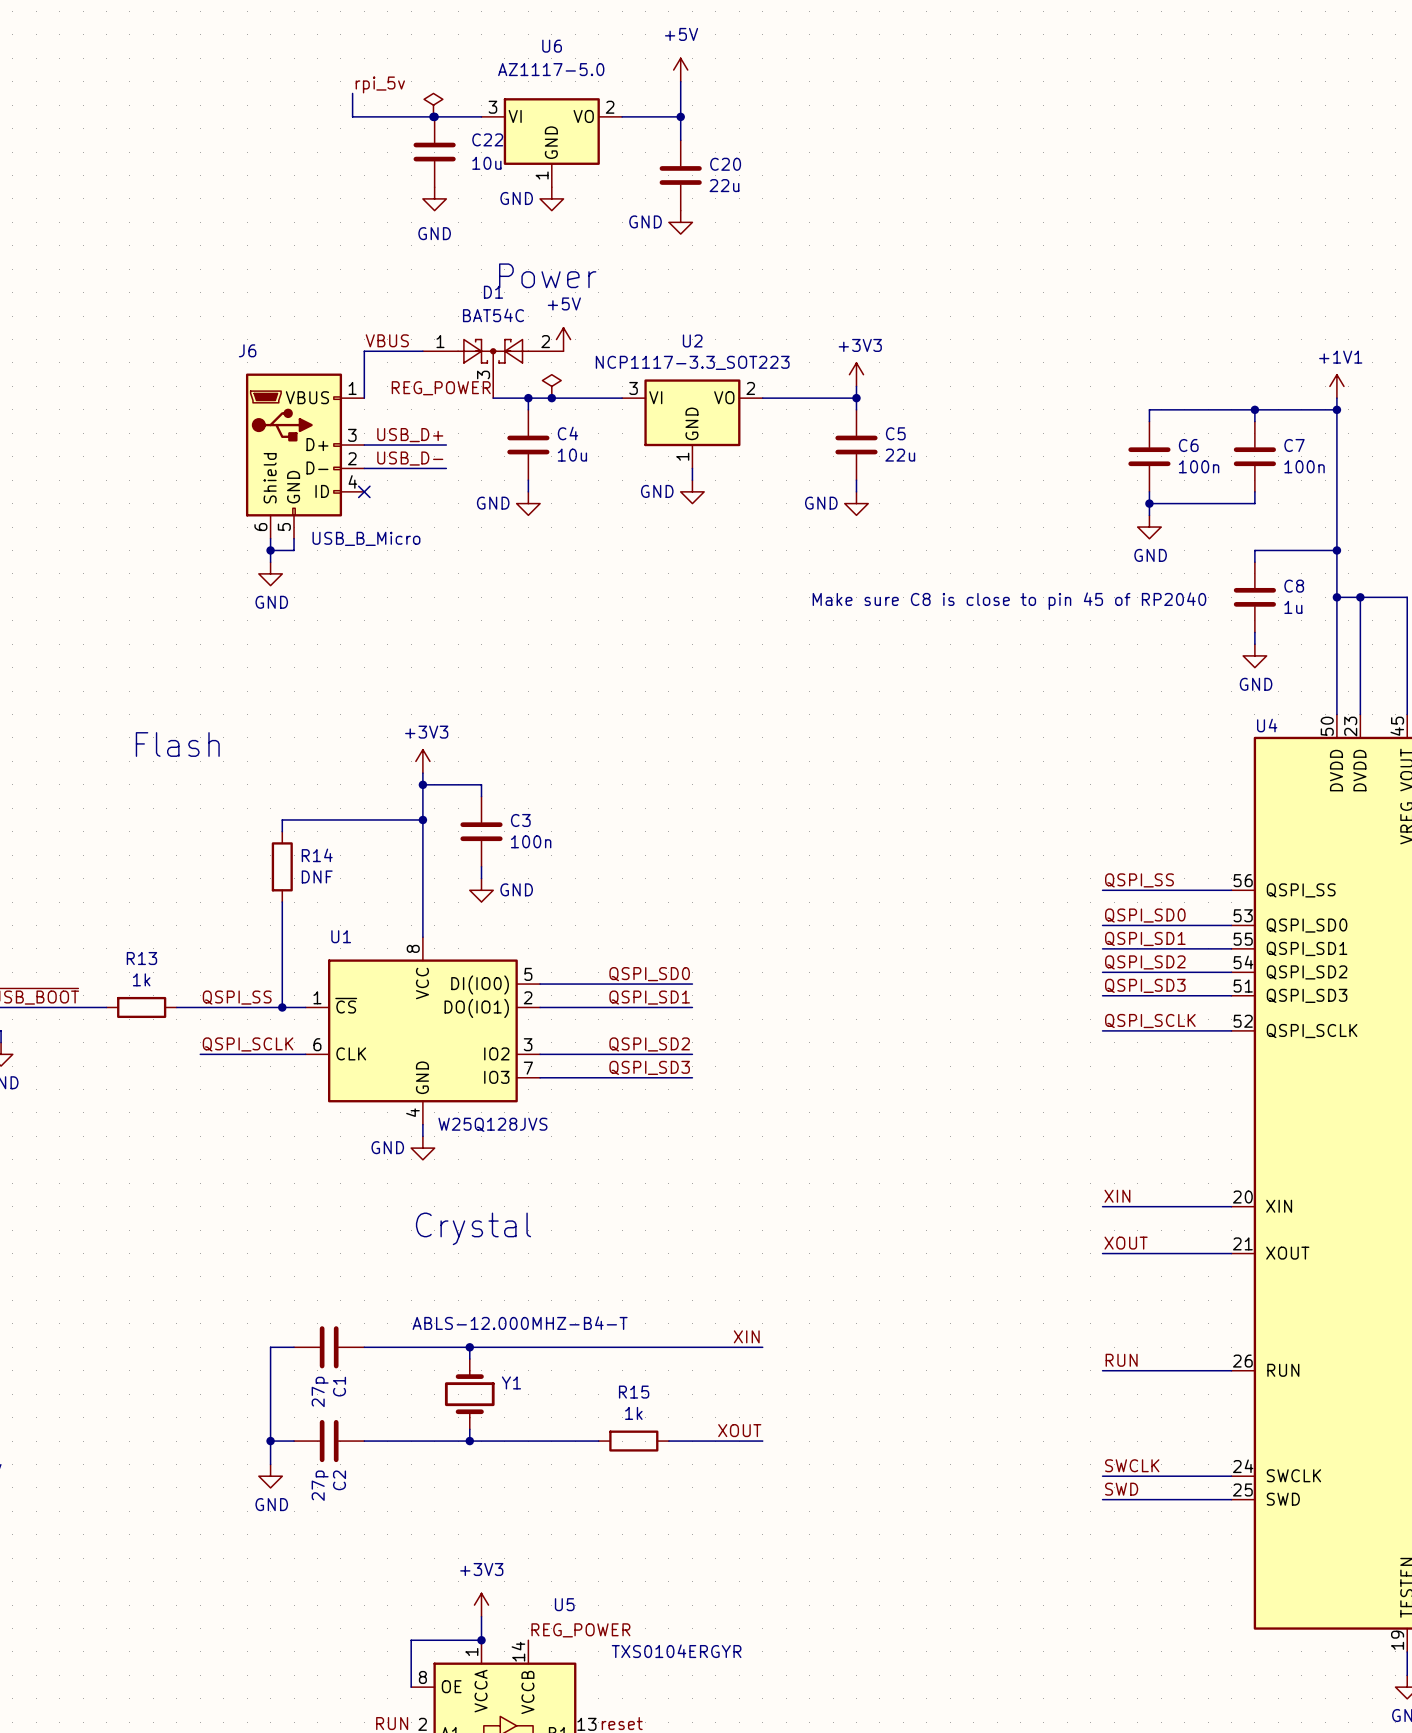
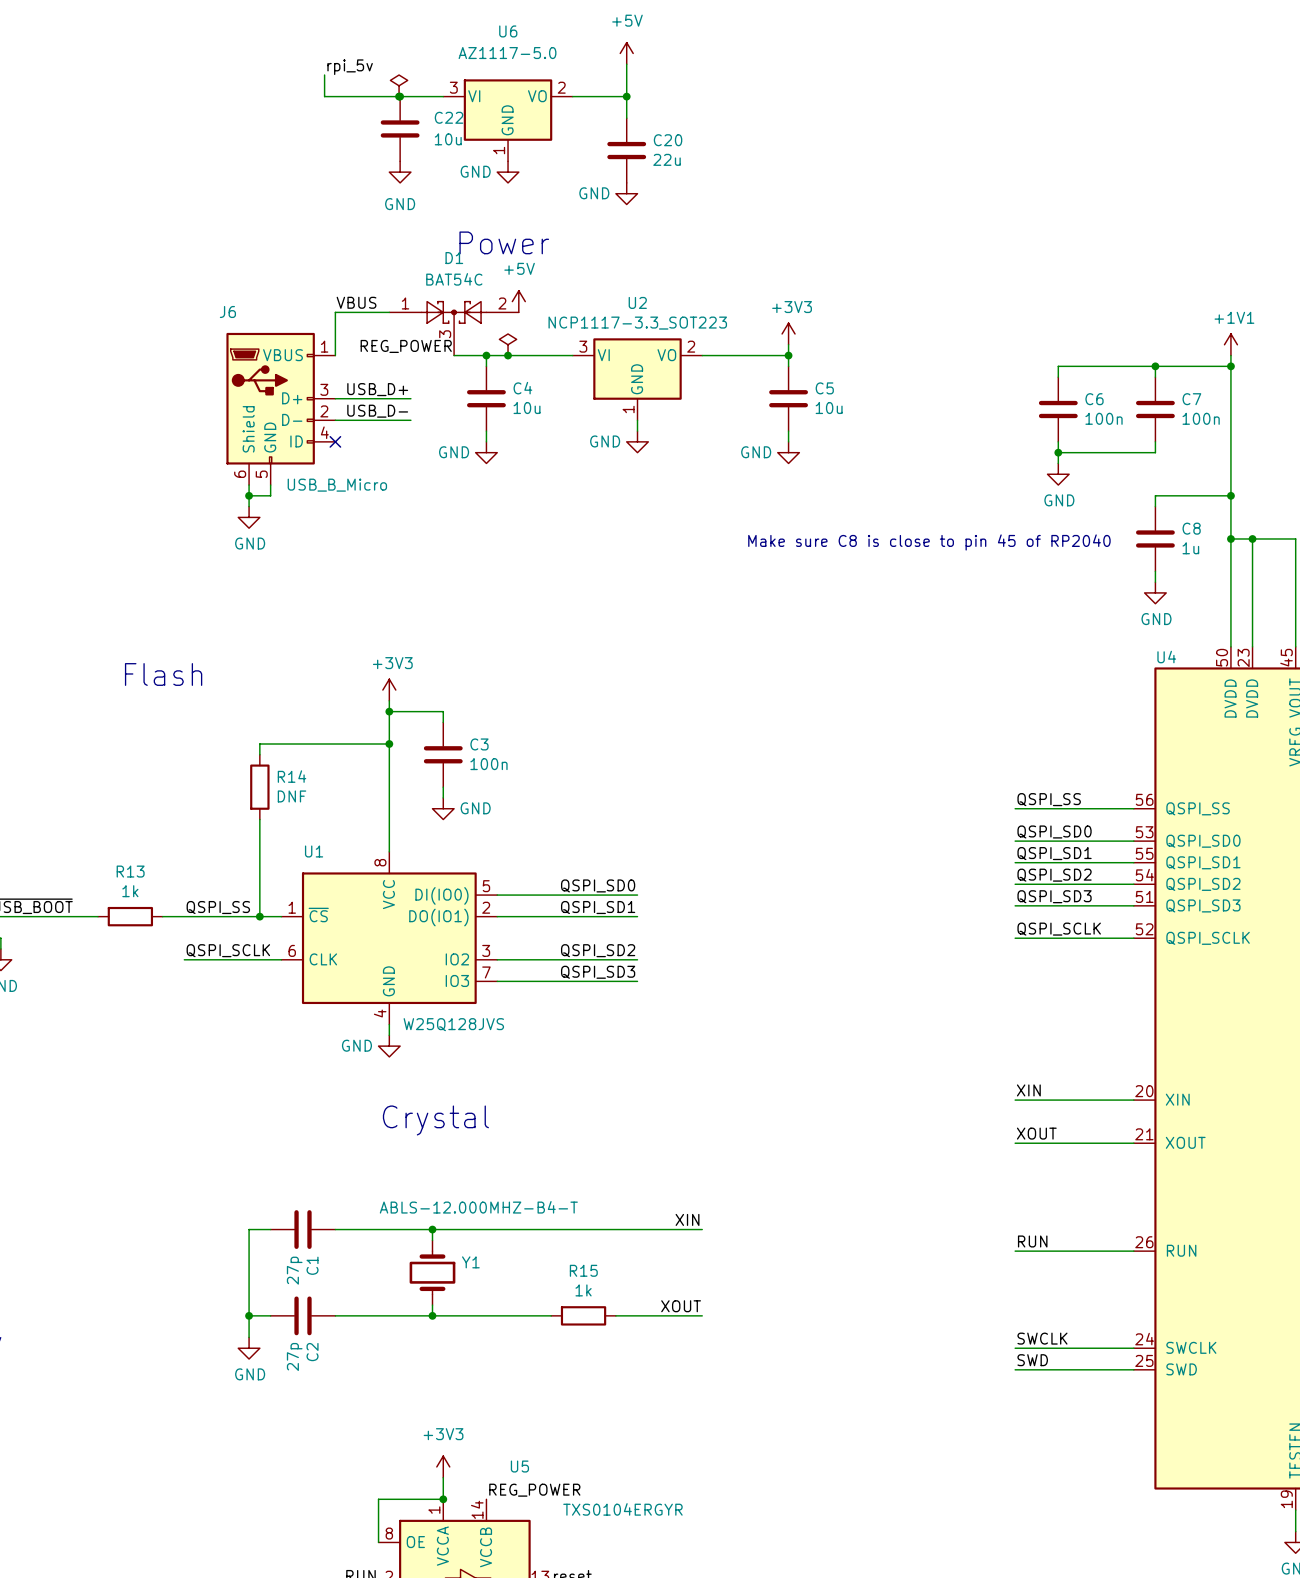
C5 value: 22u (900, 455) -> 10u (829, 408)

